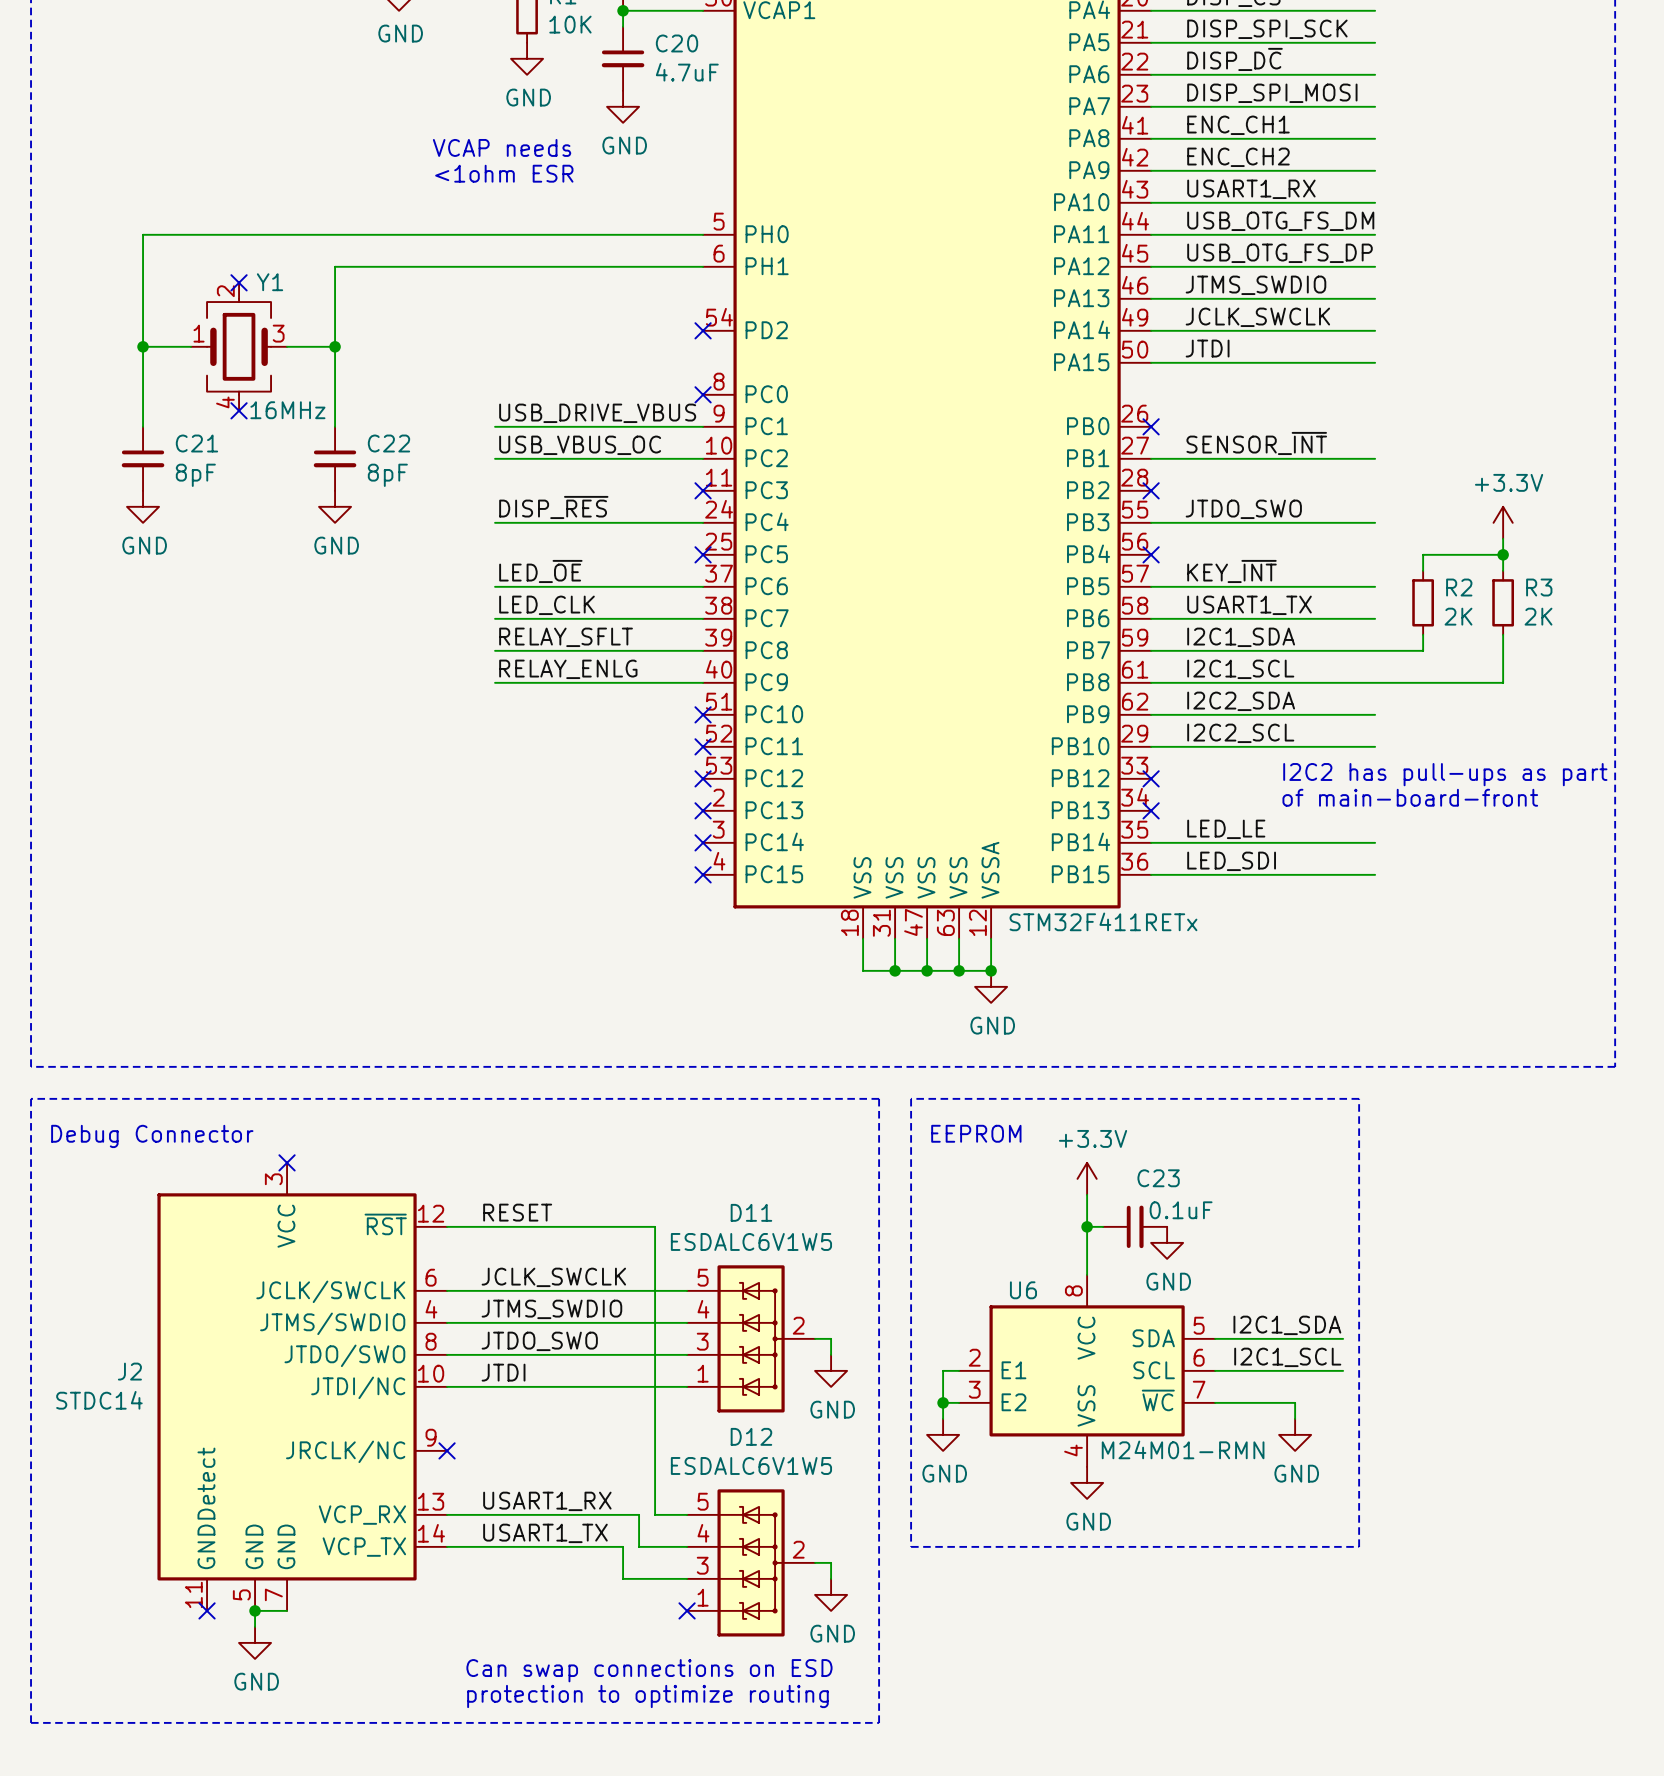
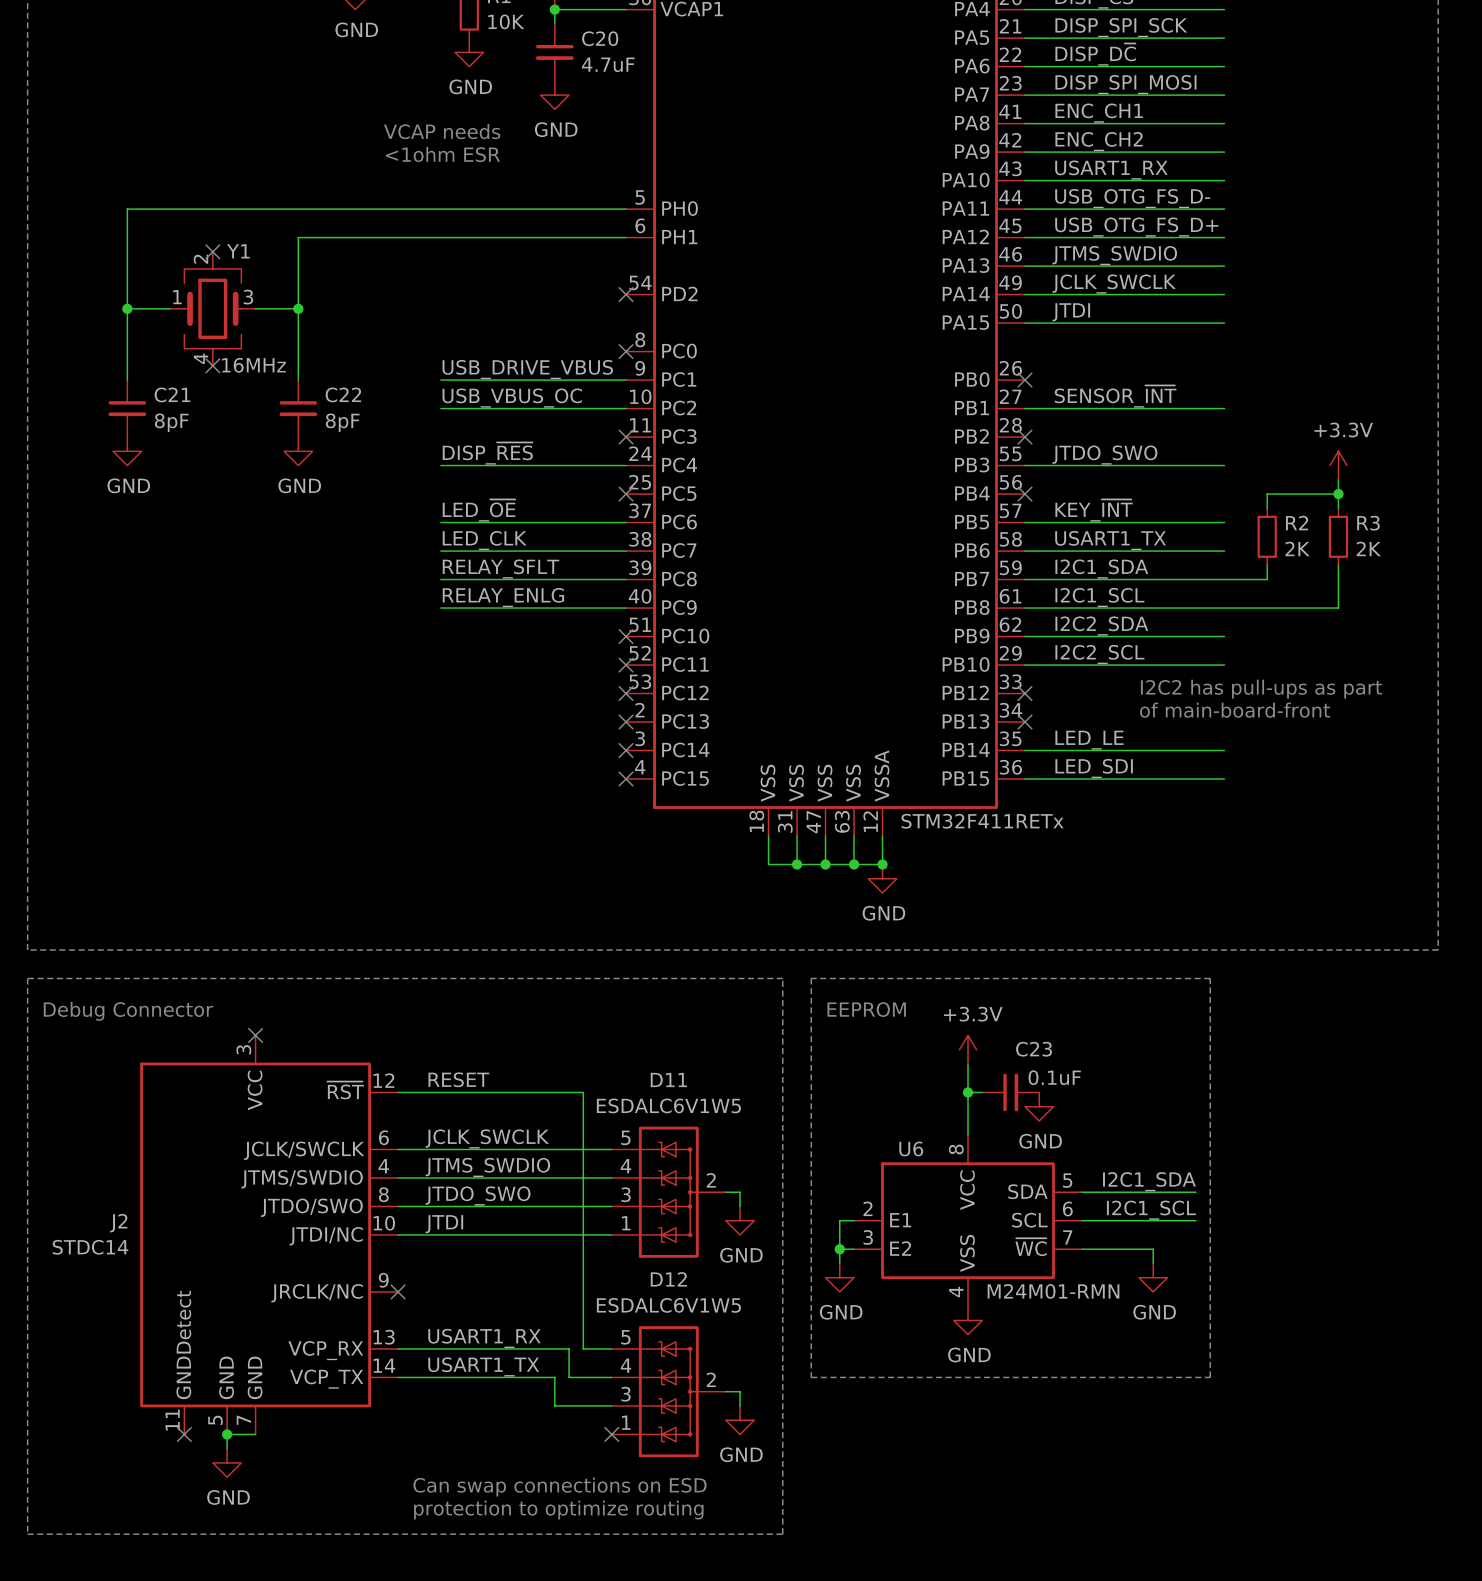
label: USB_OTG_FS_DM (1280, 221) -> USB_OTG_FS_D- (1132, 198)
label: USB_OTG_FS_DP (1279, 253) -> USB_OTG_FS_D+ (1136, 227)

